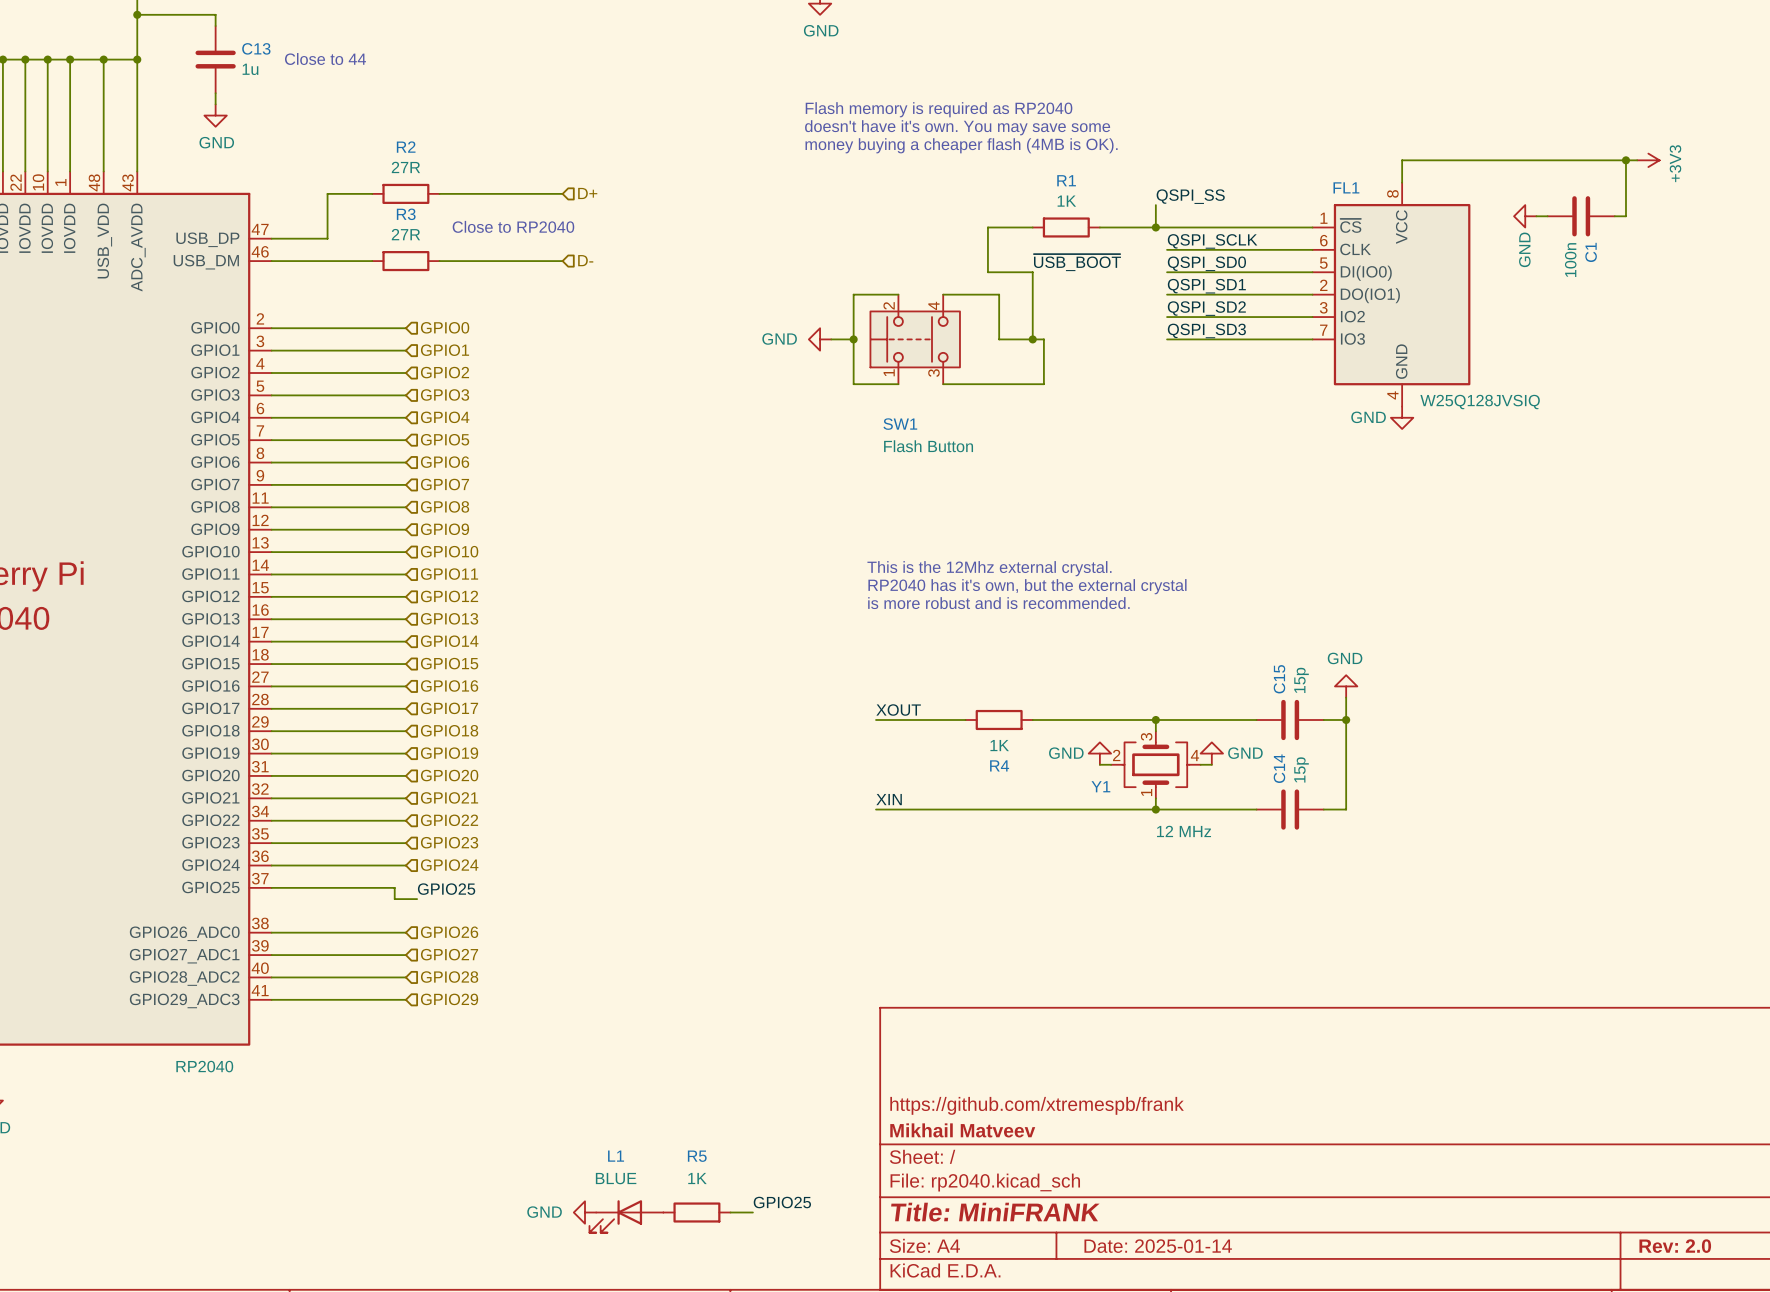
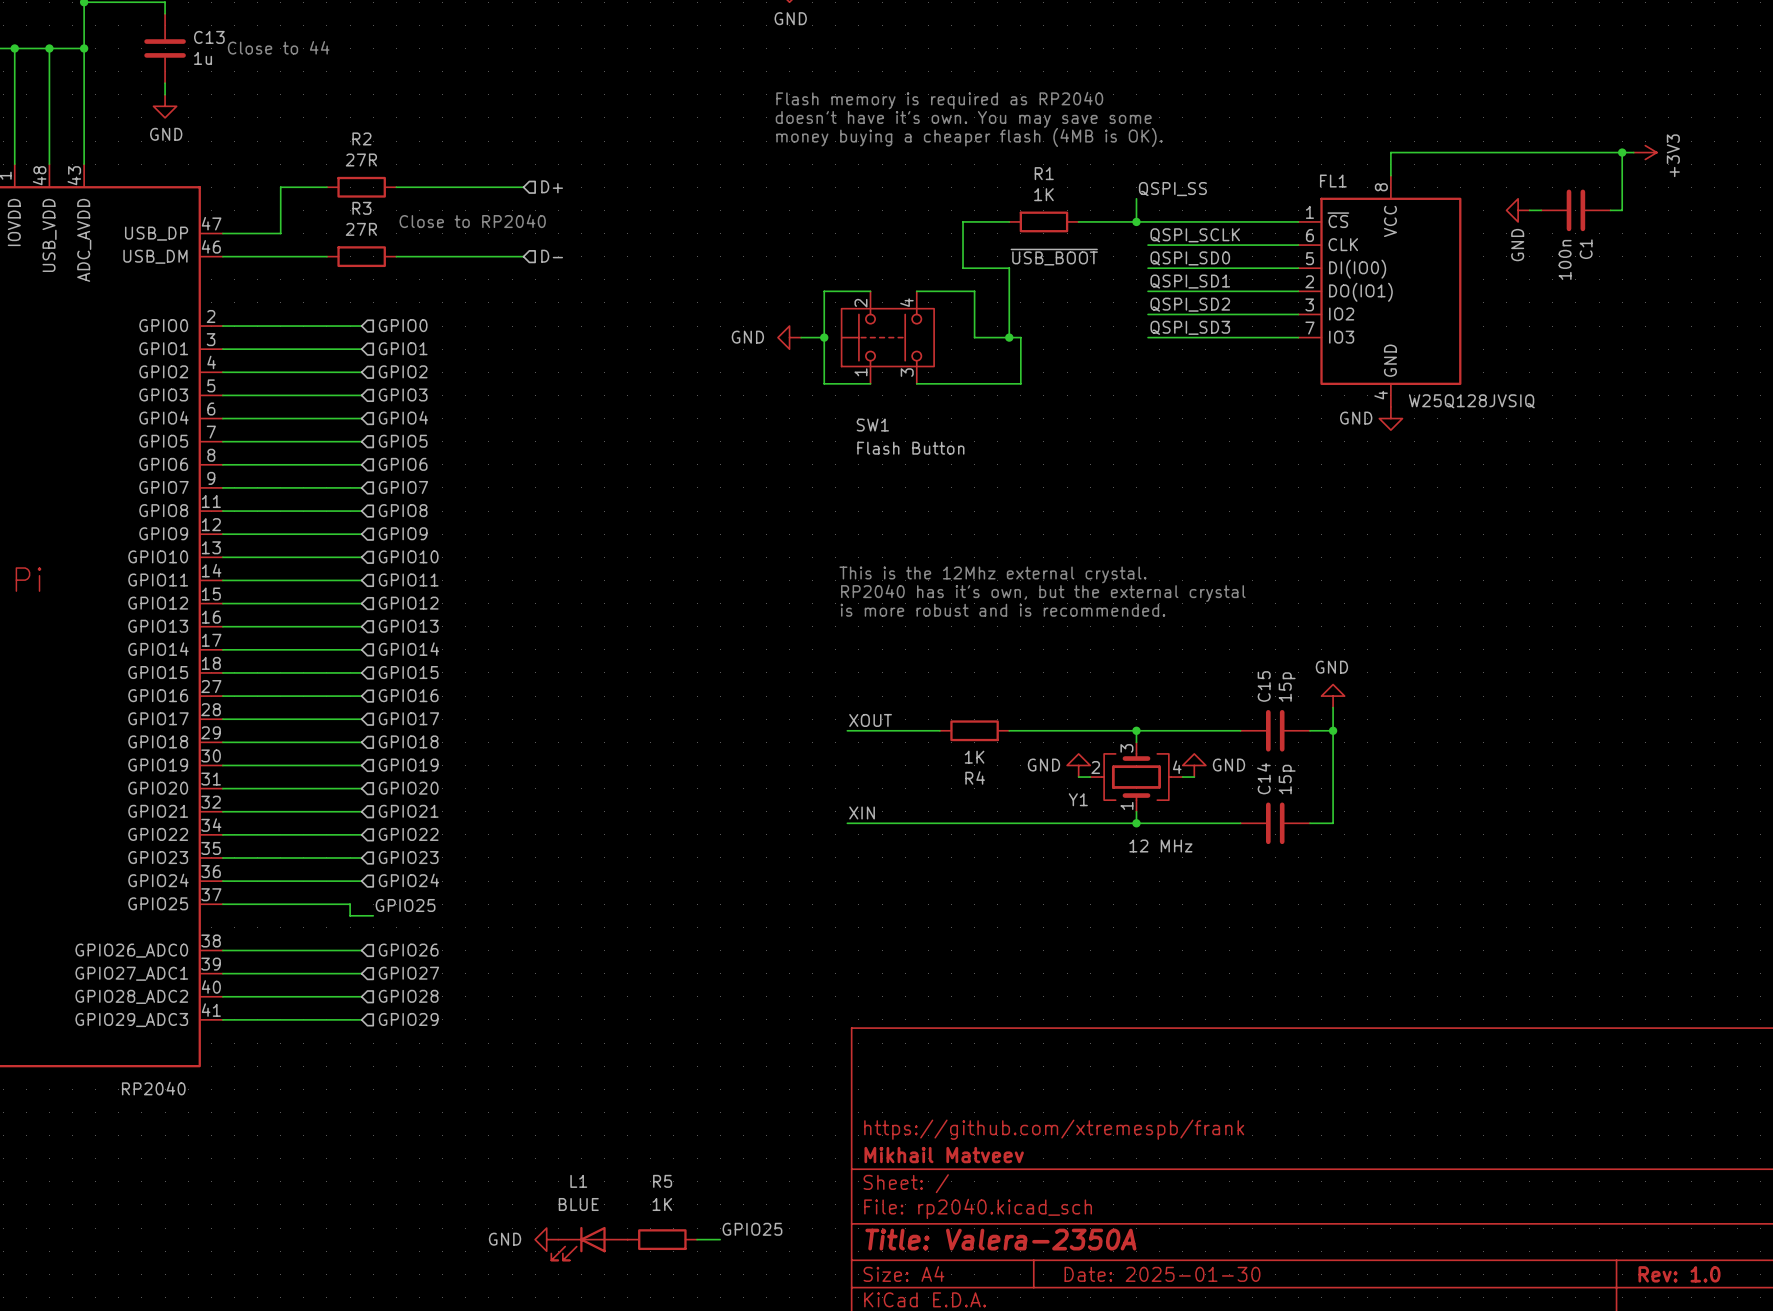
title block: Title: MiniFRANK (995, 1212) -> Title: Valera-2350A (1000, 1239)
title block: Date: 2025-01-14 (1158, 1246) -> Date: 2025-01-30 (1162, 1274)
title block: Rev: 2.0 (1675, 1246) -> Rev: 1.0 (1679, 1274)

